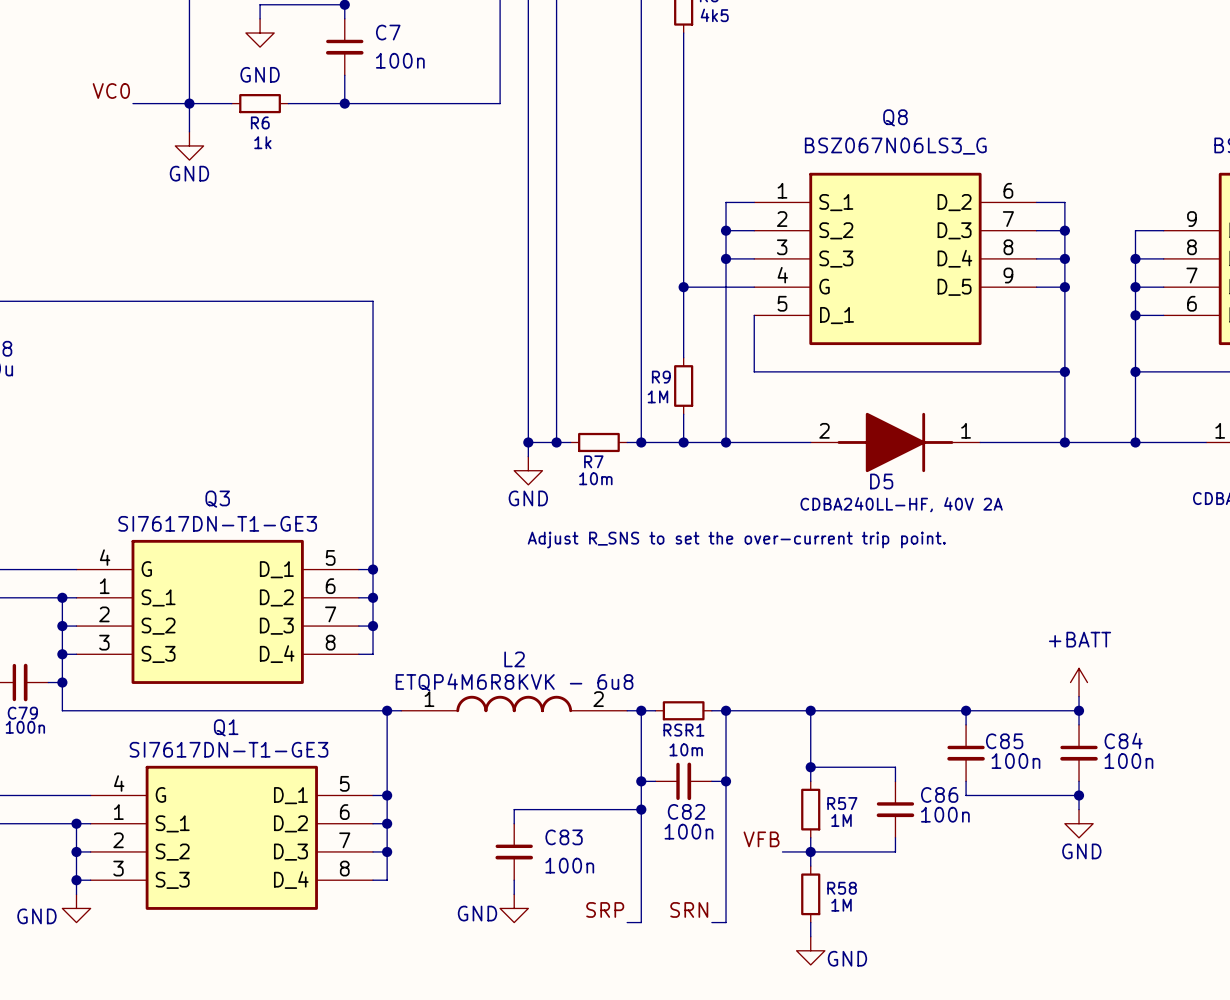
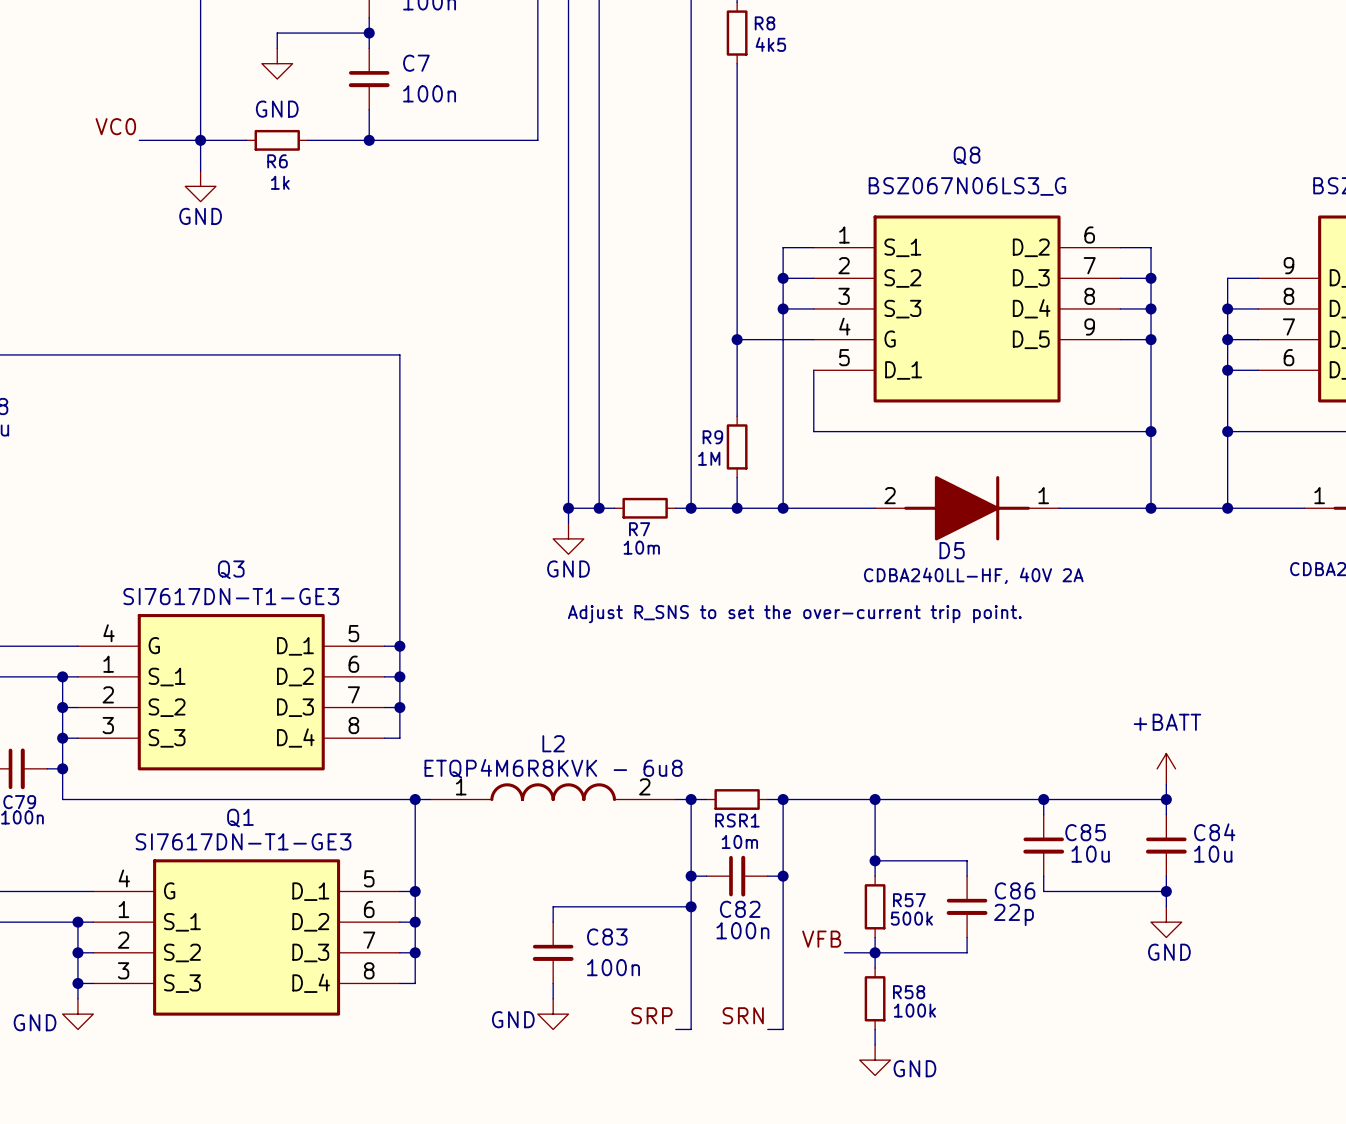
C85 value: 100n (1015, 761) -> 10u (1090, 854)
C84 value: 100n (1128, 761) -> 10u (1213, 854)
C86 value: 100n (945, 814) -> 22p (1013, 914)
R57 value: 1M (841, 820) -> 500k (911, 918)
R58 value: 1M (841, 905) -> 100k (914, 1010)

